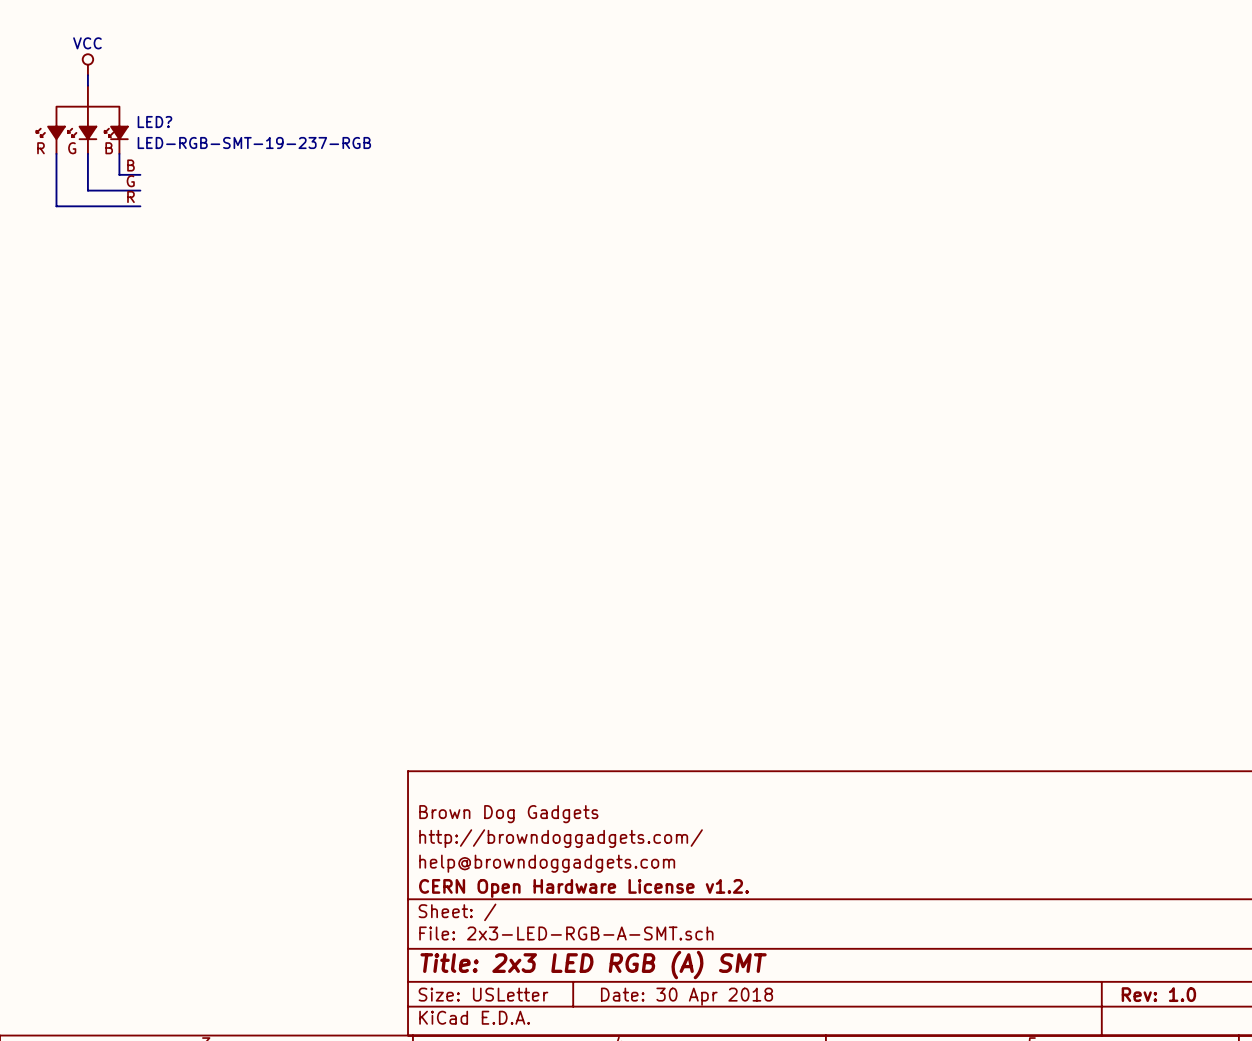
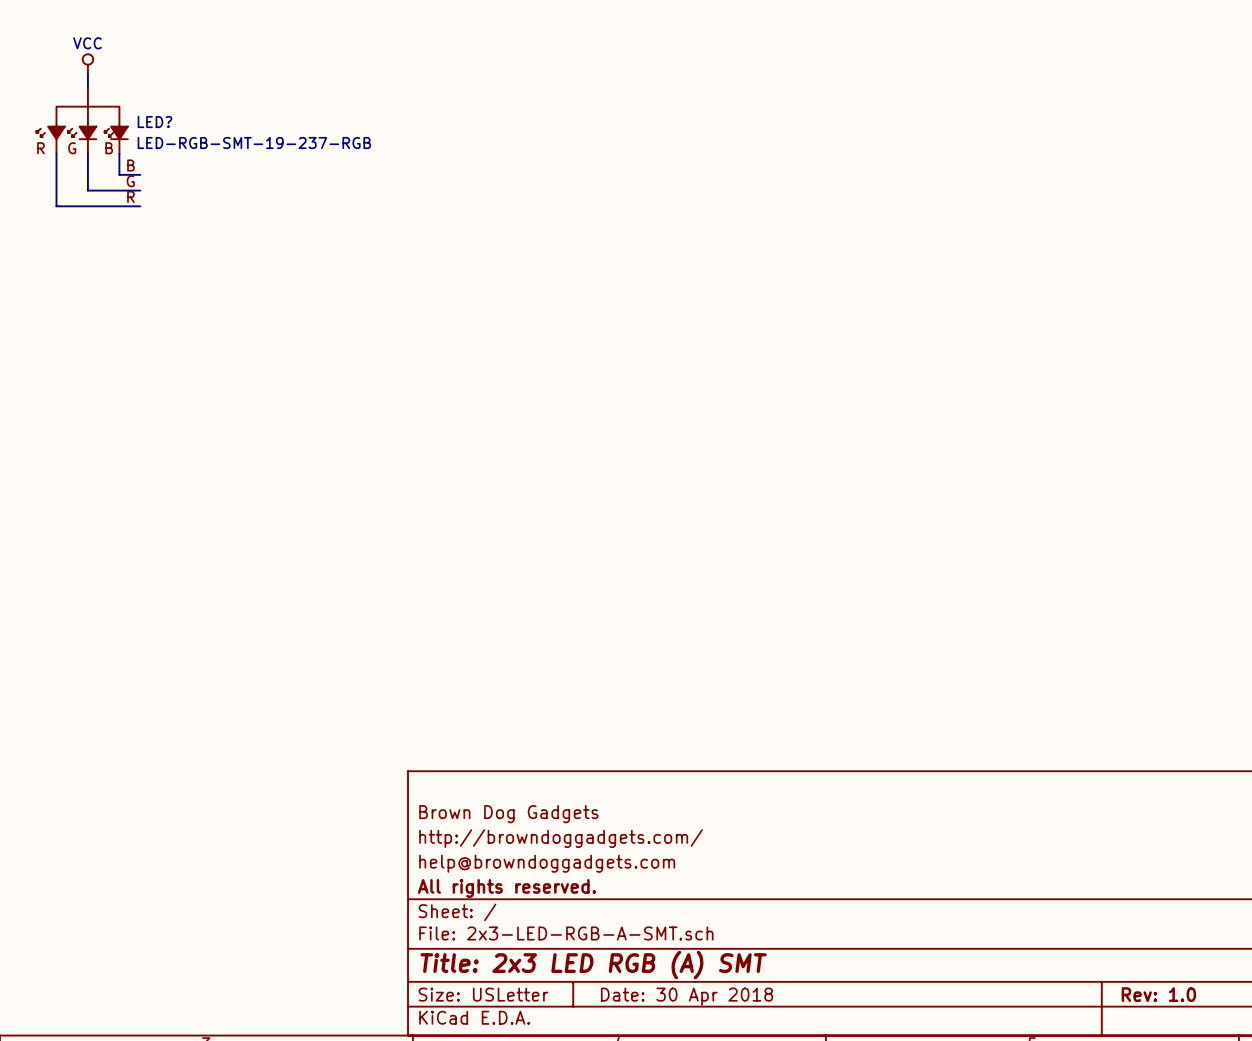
title block: CERN Open Hardware License v1.2. (583, 888) -> All rights reserved. (506, 888)

